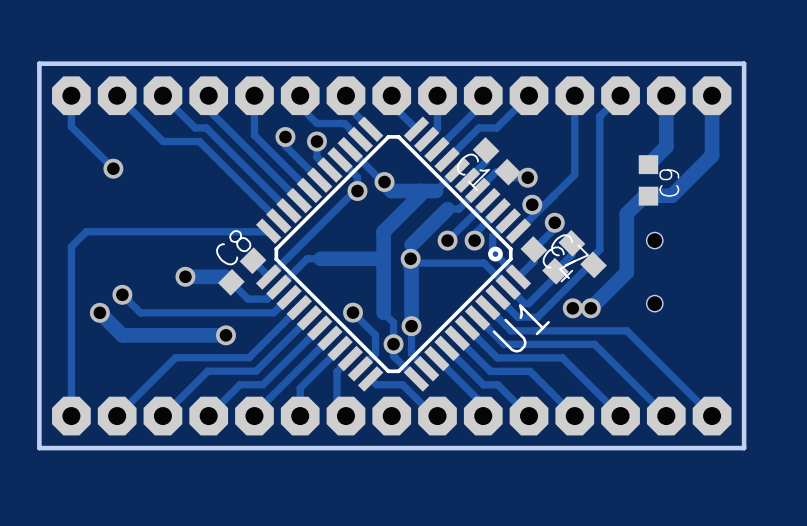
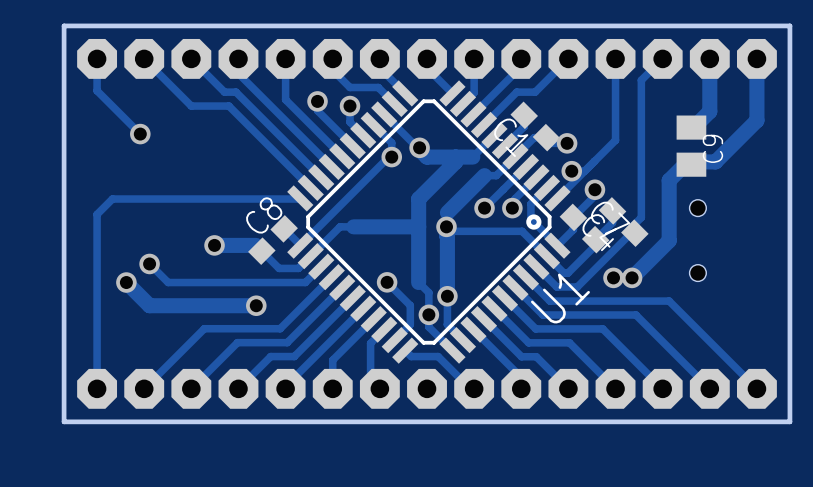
C9 footprint: [638, 155, 659, 206] -> [676, 115, 707, 177]

